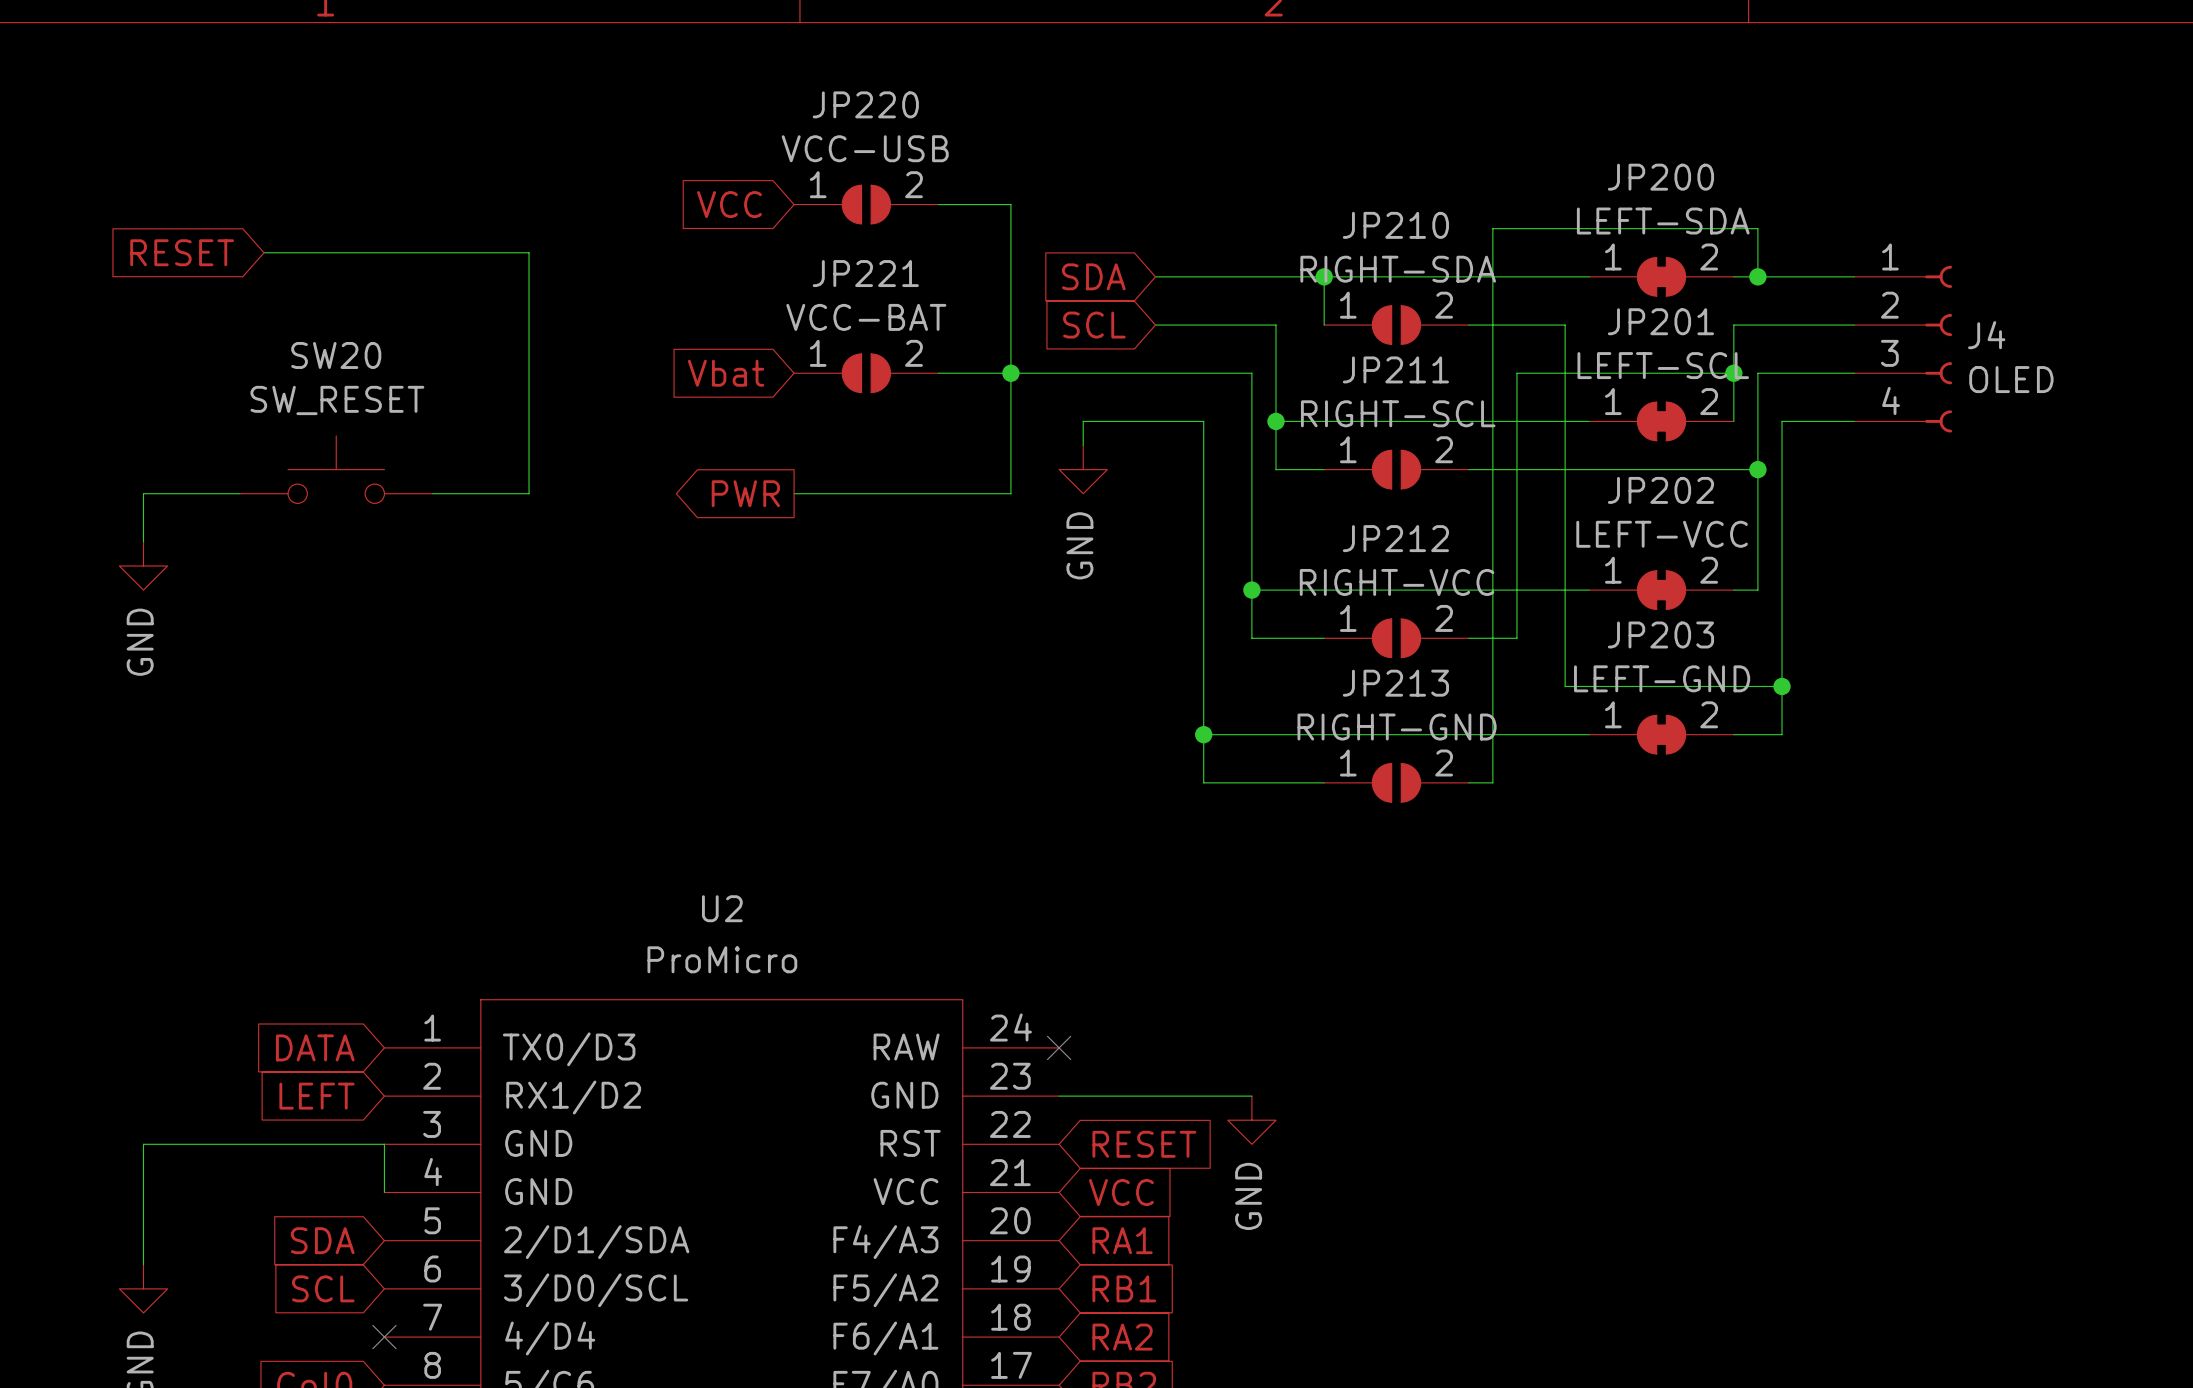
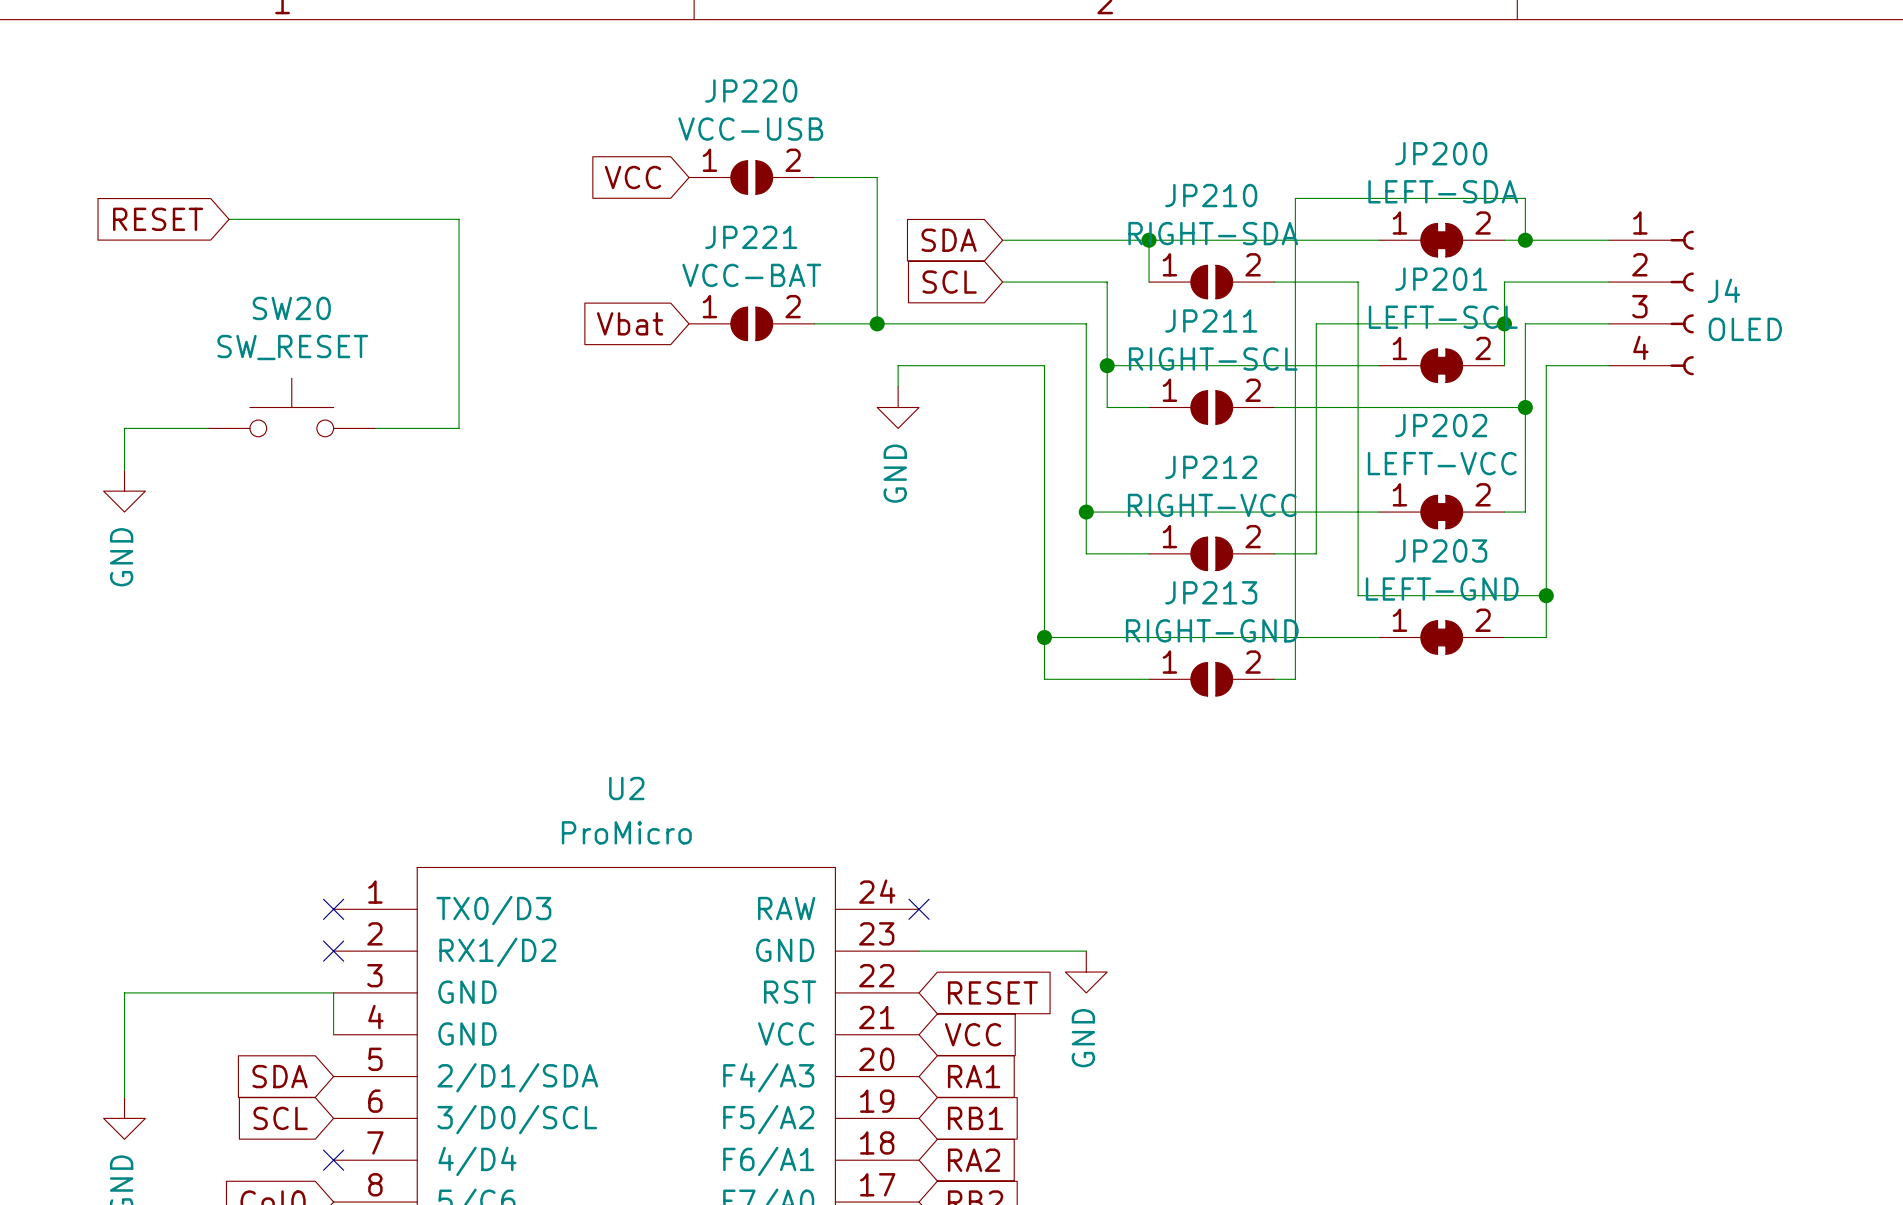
wire: (1010, 373) (1010, 493) (794, 493) -> none
wire: (1083, 421) (1083, 445) -> (939, 365) (898, 365) (898, 386)
power symbol position: GND (1083, 469) -> GND (898, 407)
global label: PWR (745, 493) -> none
global label: DATA (315, 1047) -> none
no-connect mark: none -> (333, 909)
global label: LEFT (316, 1096) -> none
no-connect mark: none -> (333, 951)

